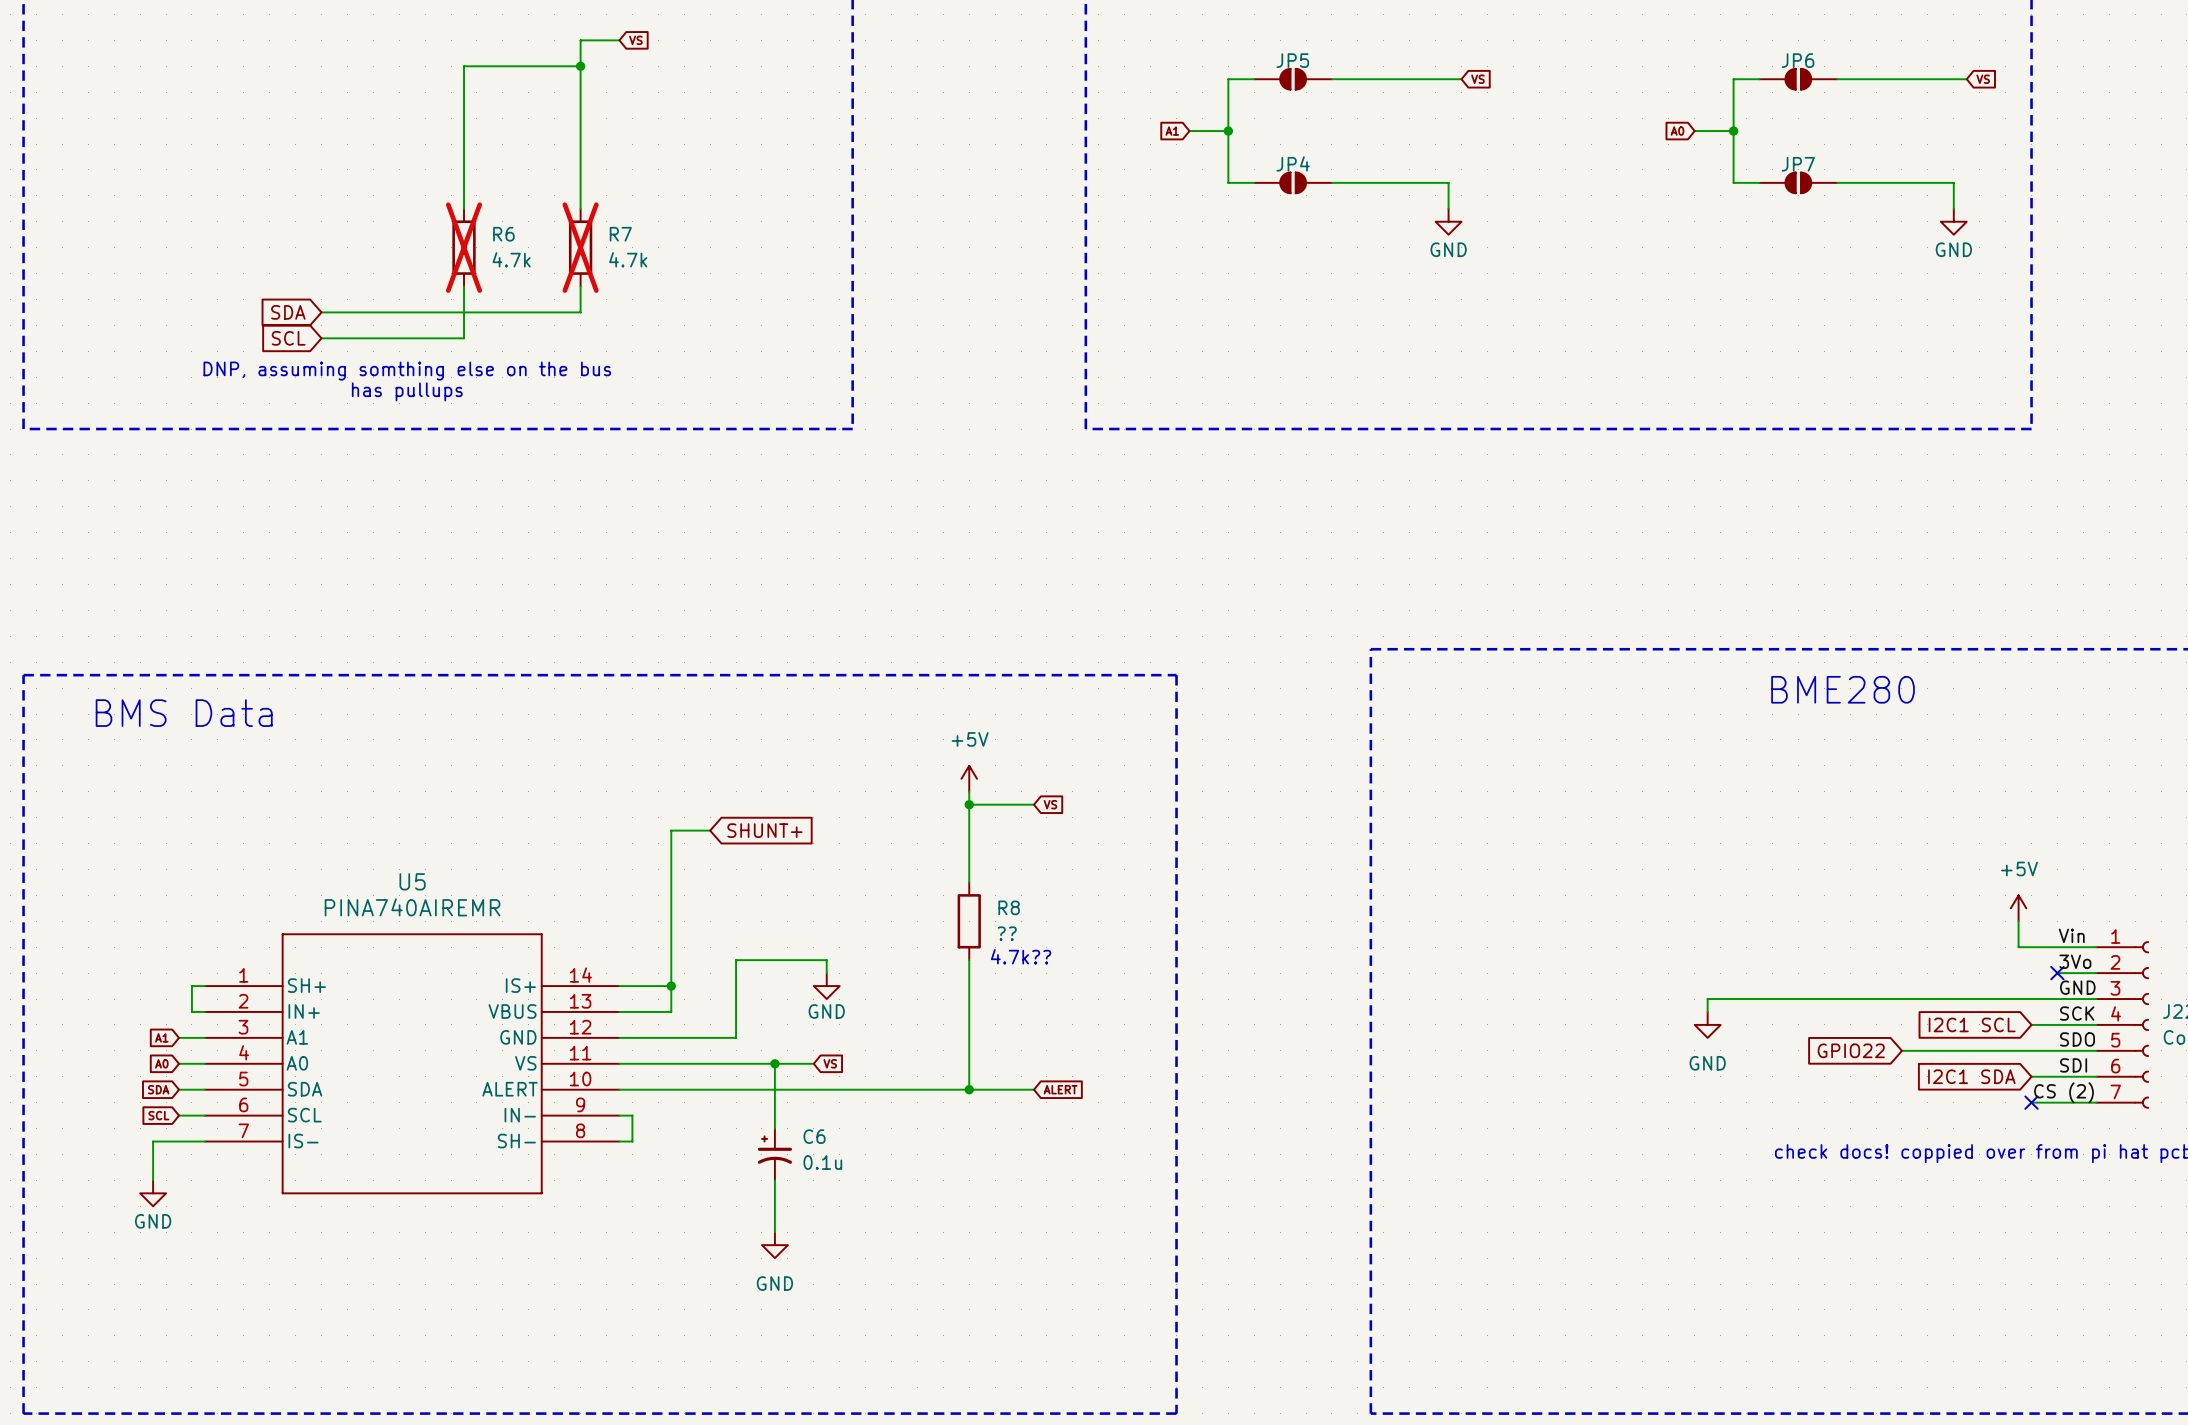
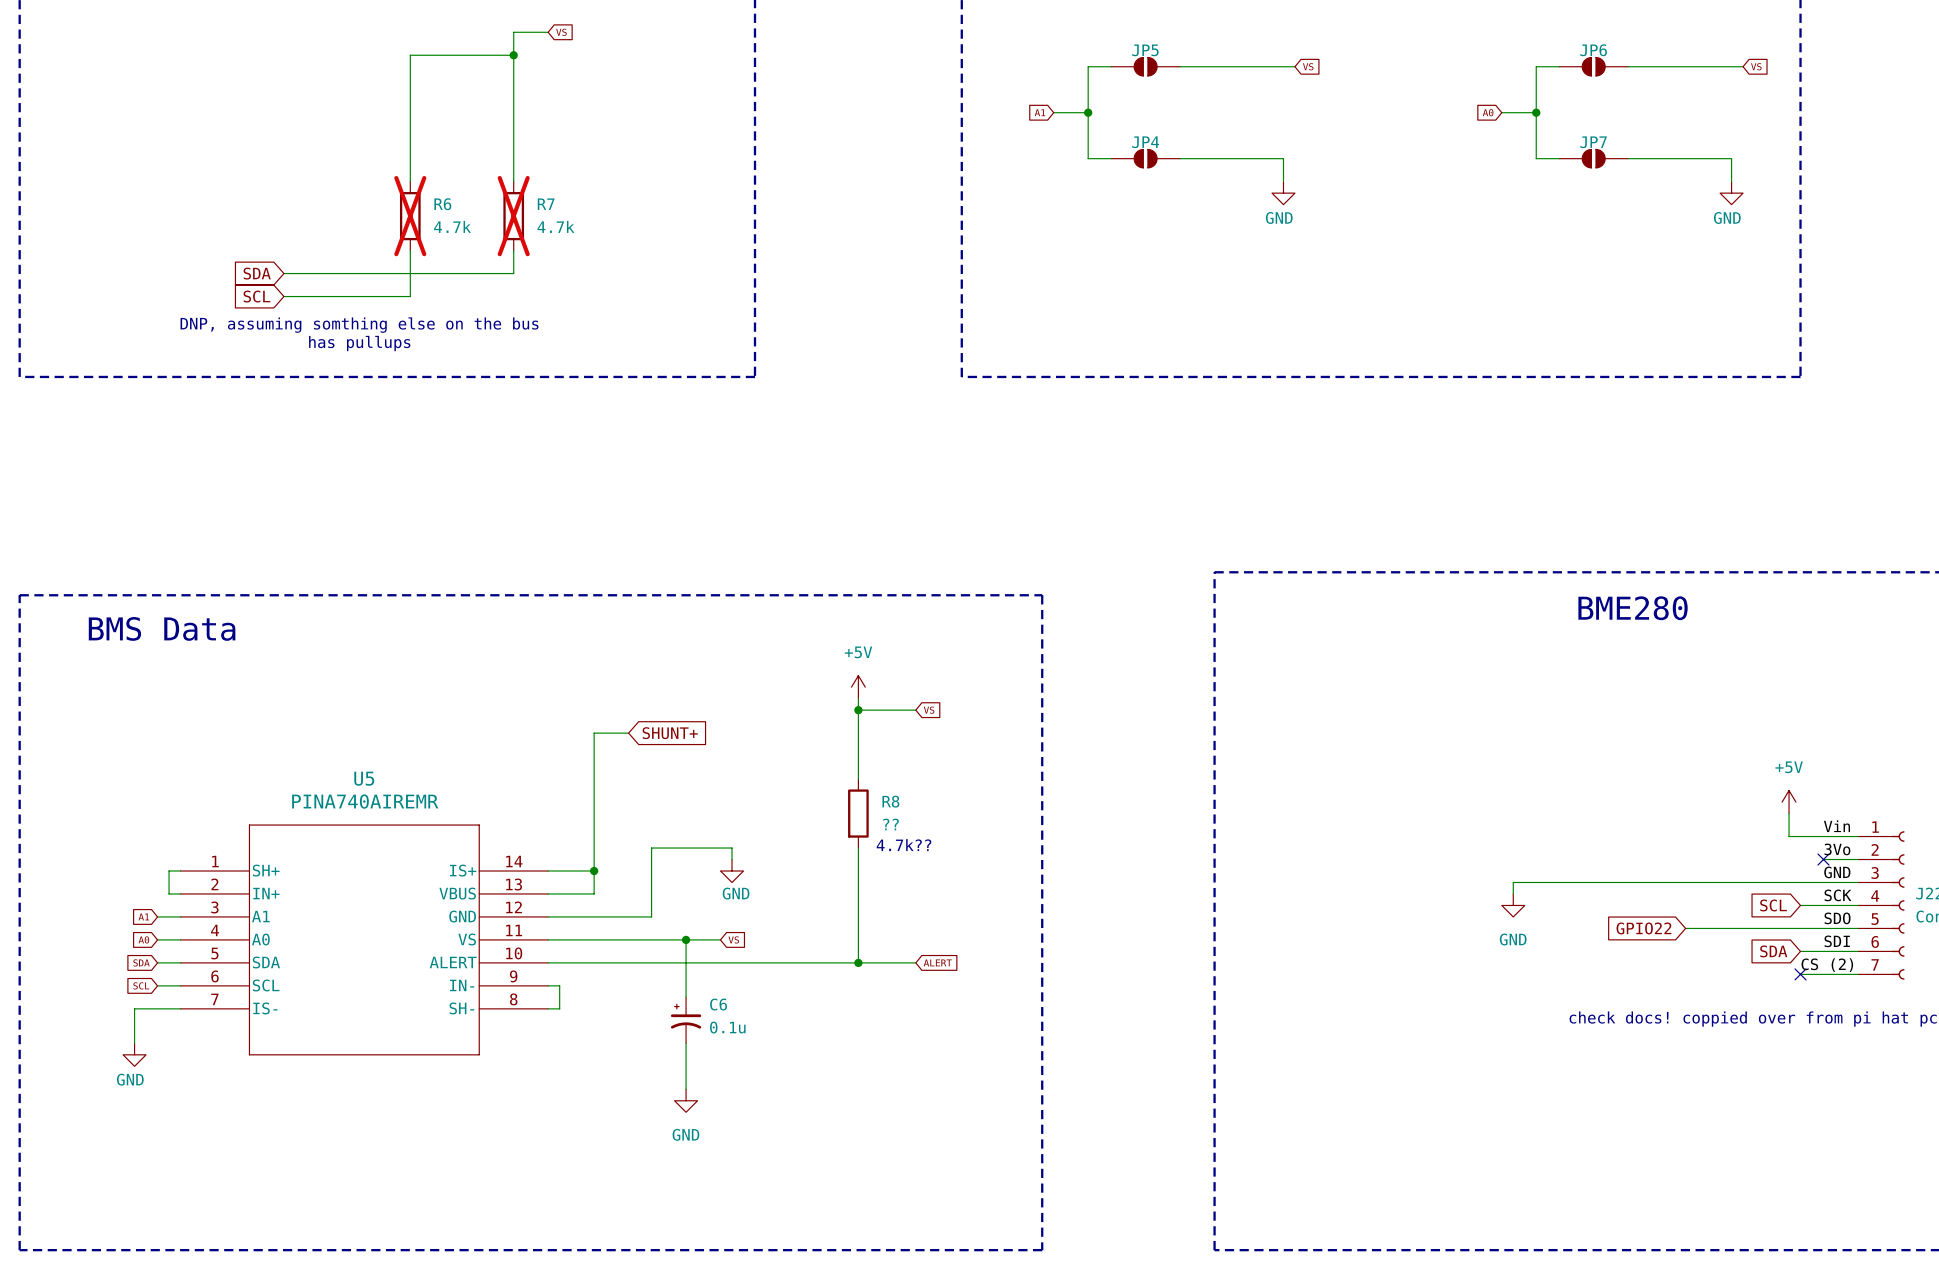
global label: I2C1 SCL (1972, 1024) -> SCL (1773, 905)
global label: I2C1 SDA (1971, 1076) -> SDA (1773, 951)

